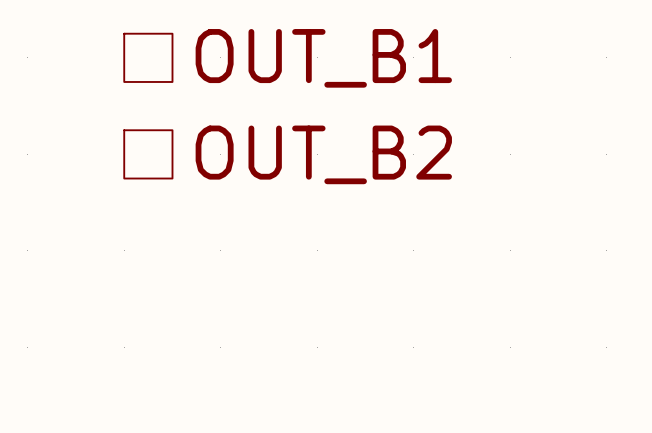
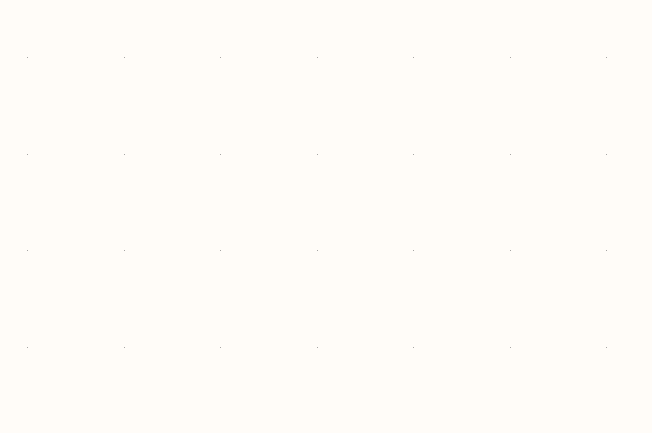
hierarchical label: OUT_B1 (323, 58) -> none
hierarchical label: OUT_B2 (323, 154) -> none

